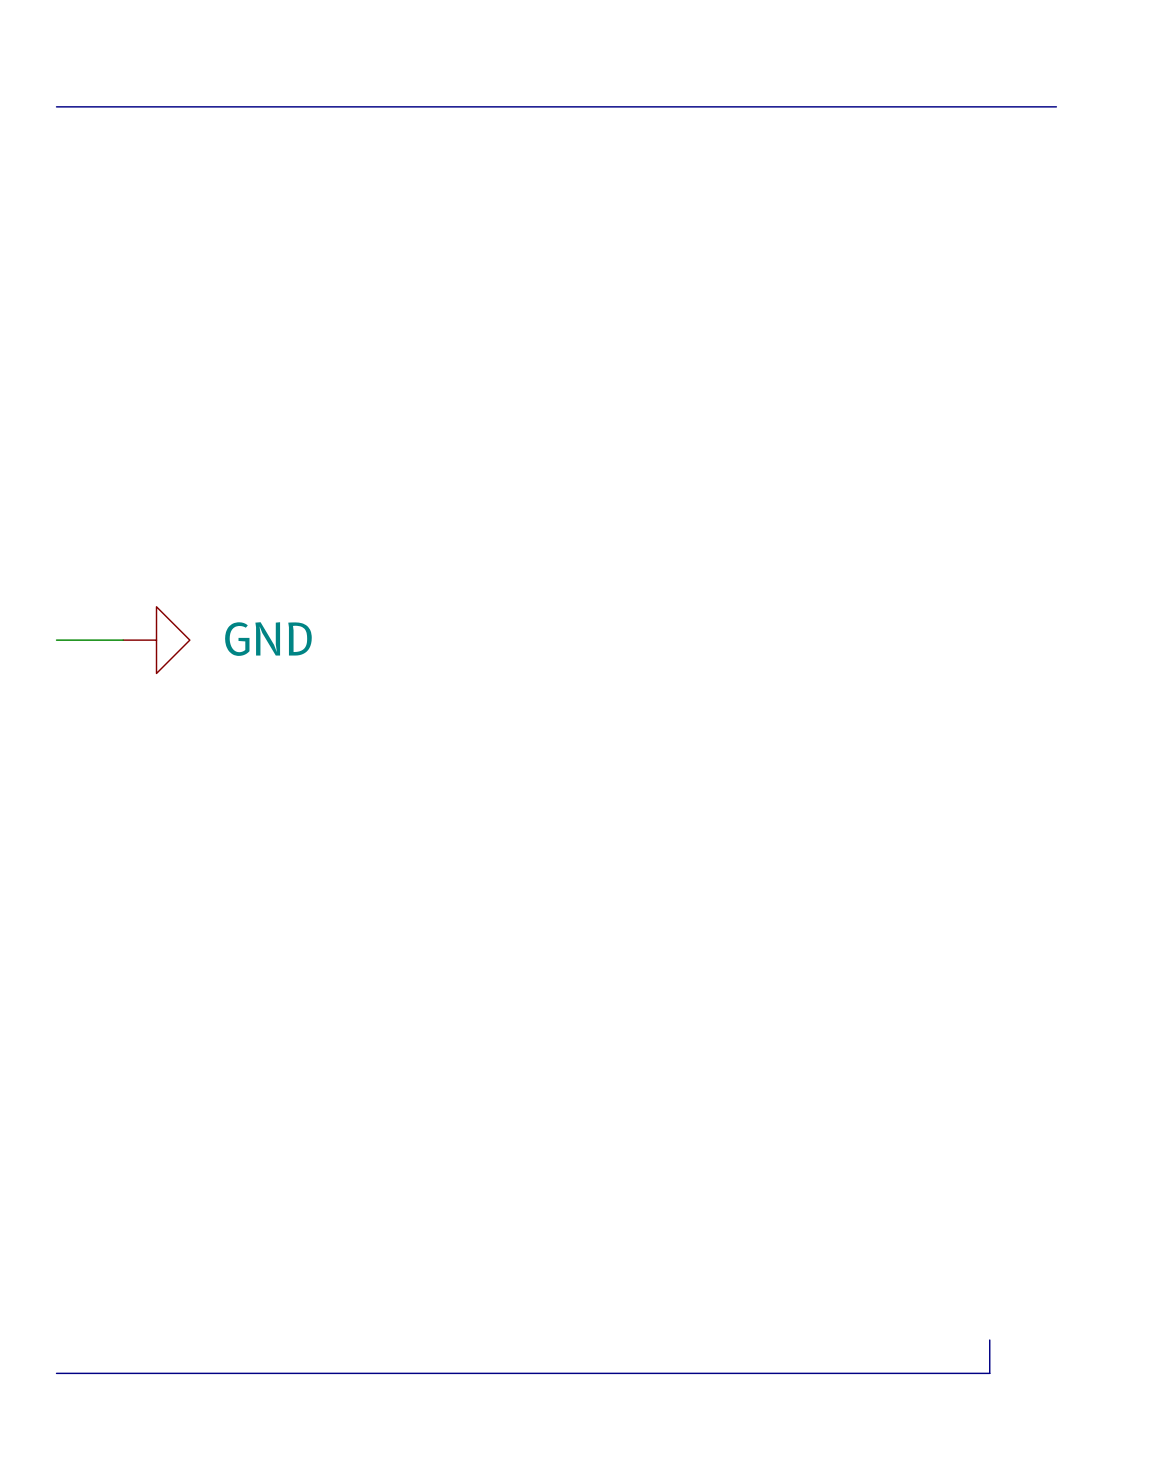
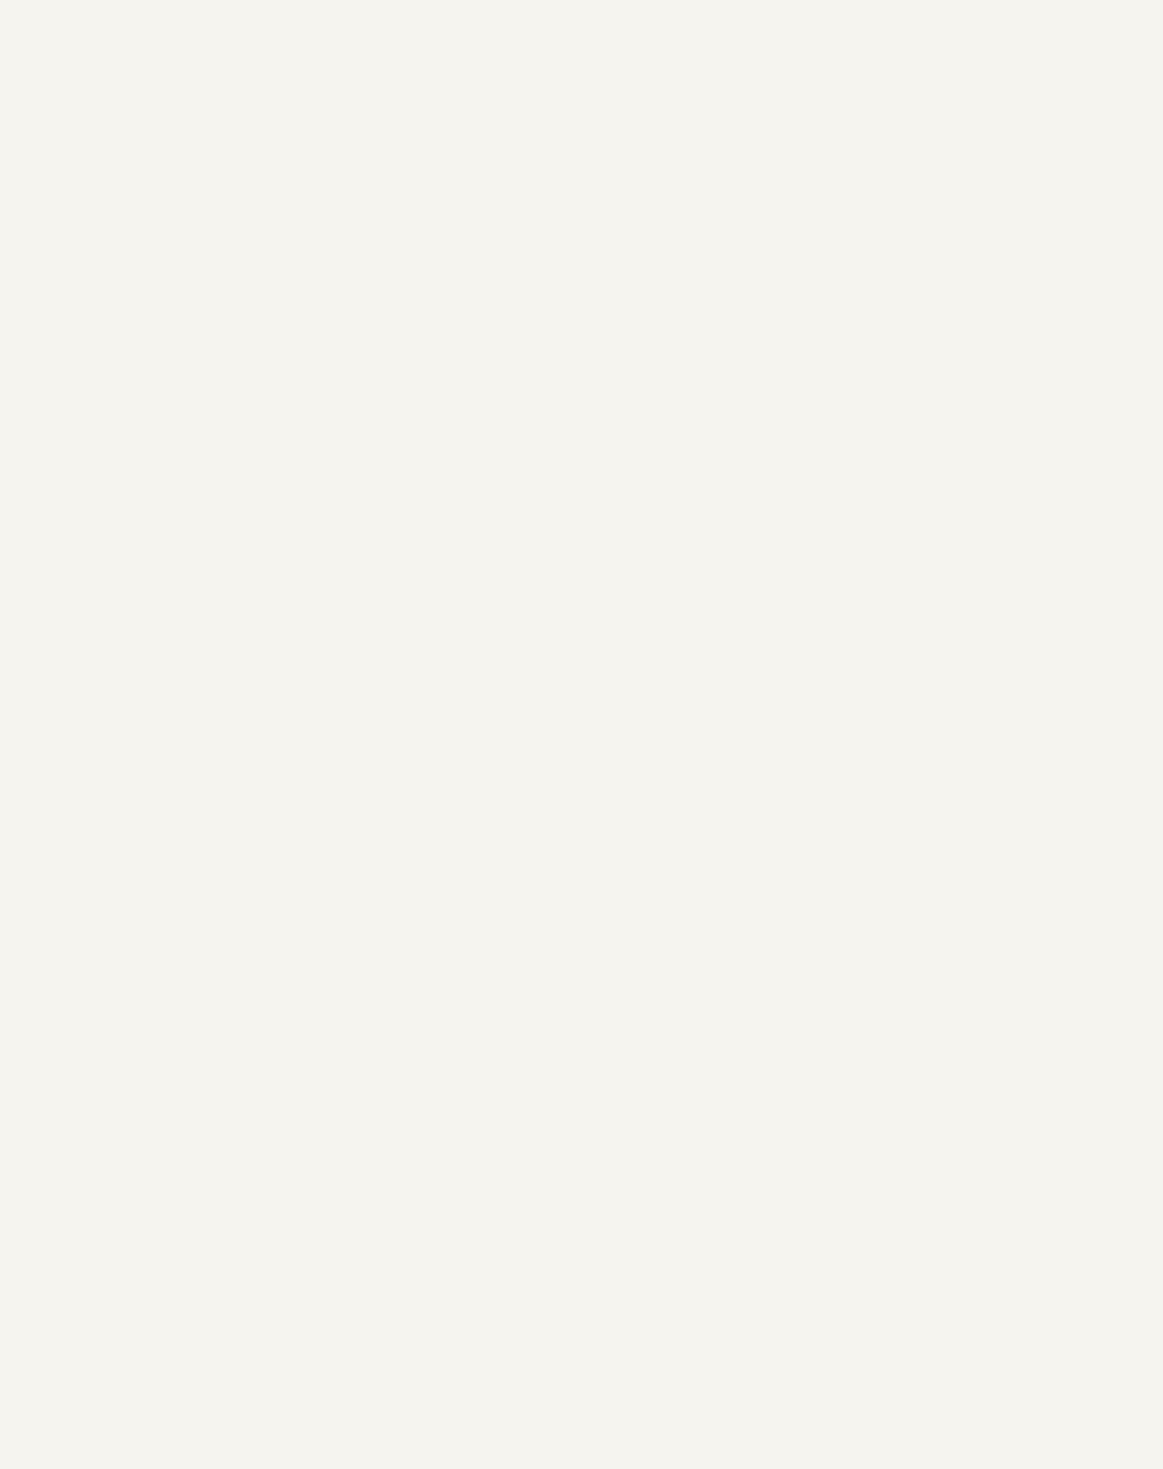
bus: (56, 106) (1056, 106) -> none
wire: (56, 640) (123, 640) -> none
power symbol: GND (156, 640) -> none
bus: (989, 1340) (989, 1373) (56, 1373) -> none

